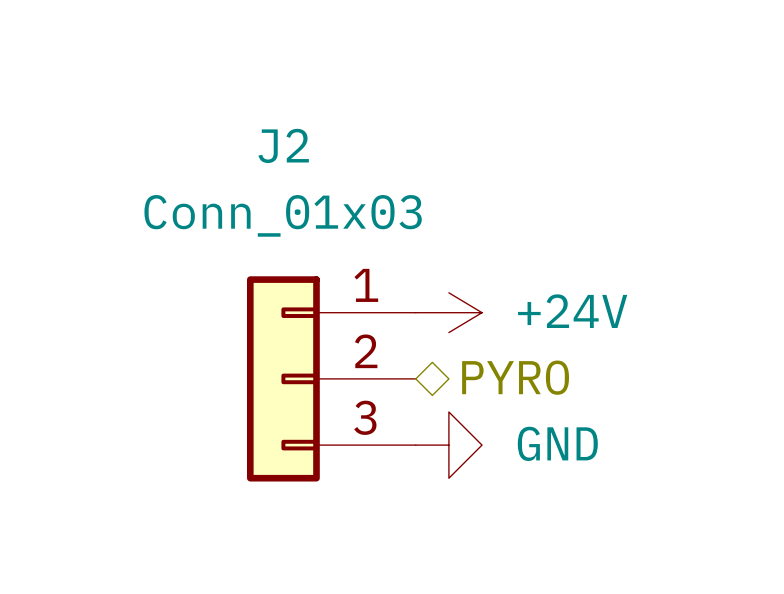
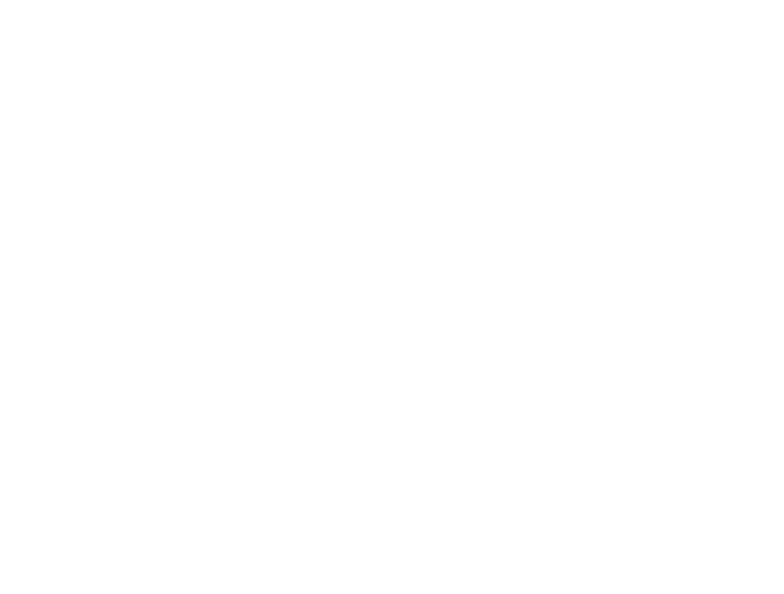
power symbol: +24V (448, 312) -> none
hierarchical label: PYRO (515, 377) -> none
J2: Conn_01x03 (331, 378) -> none
power symbol: GND (448, 445) -> none

